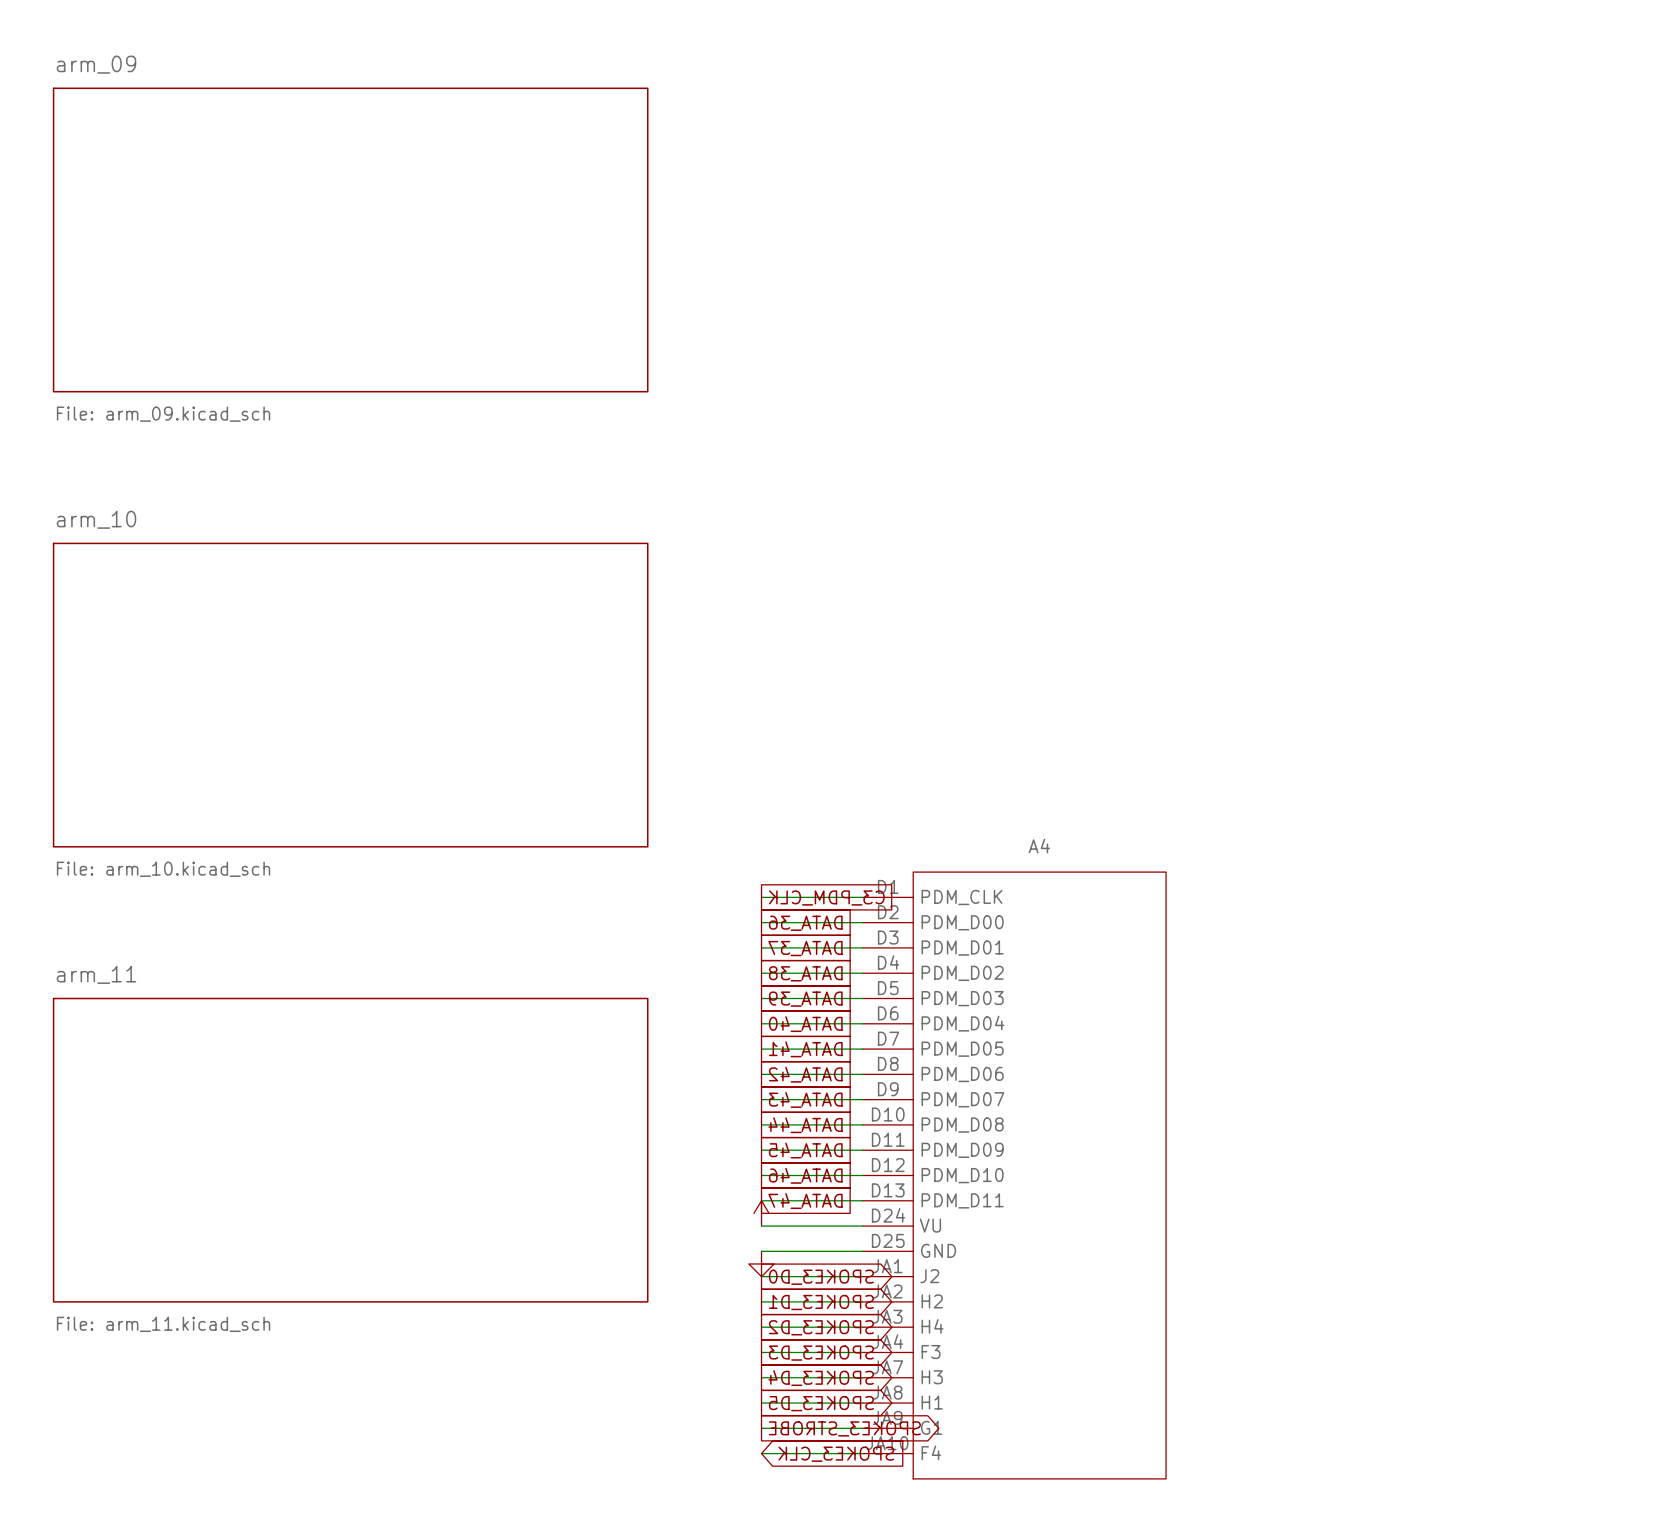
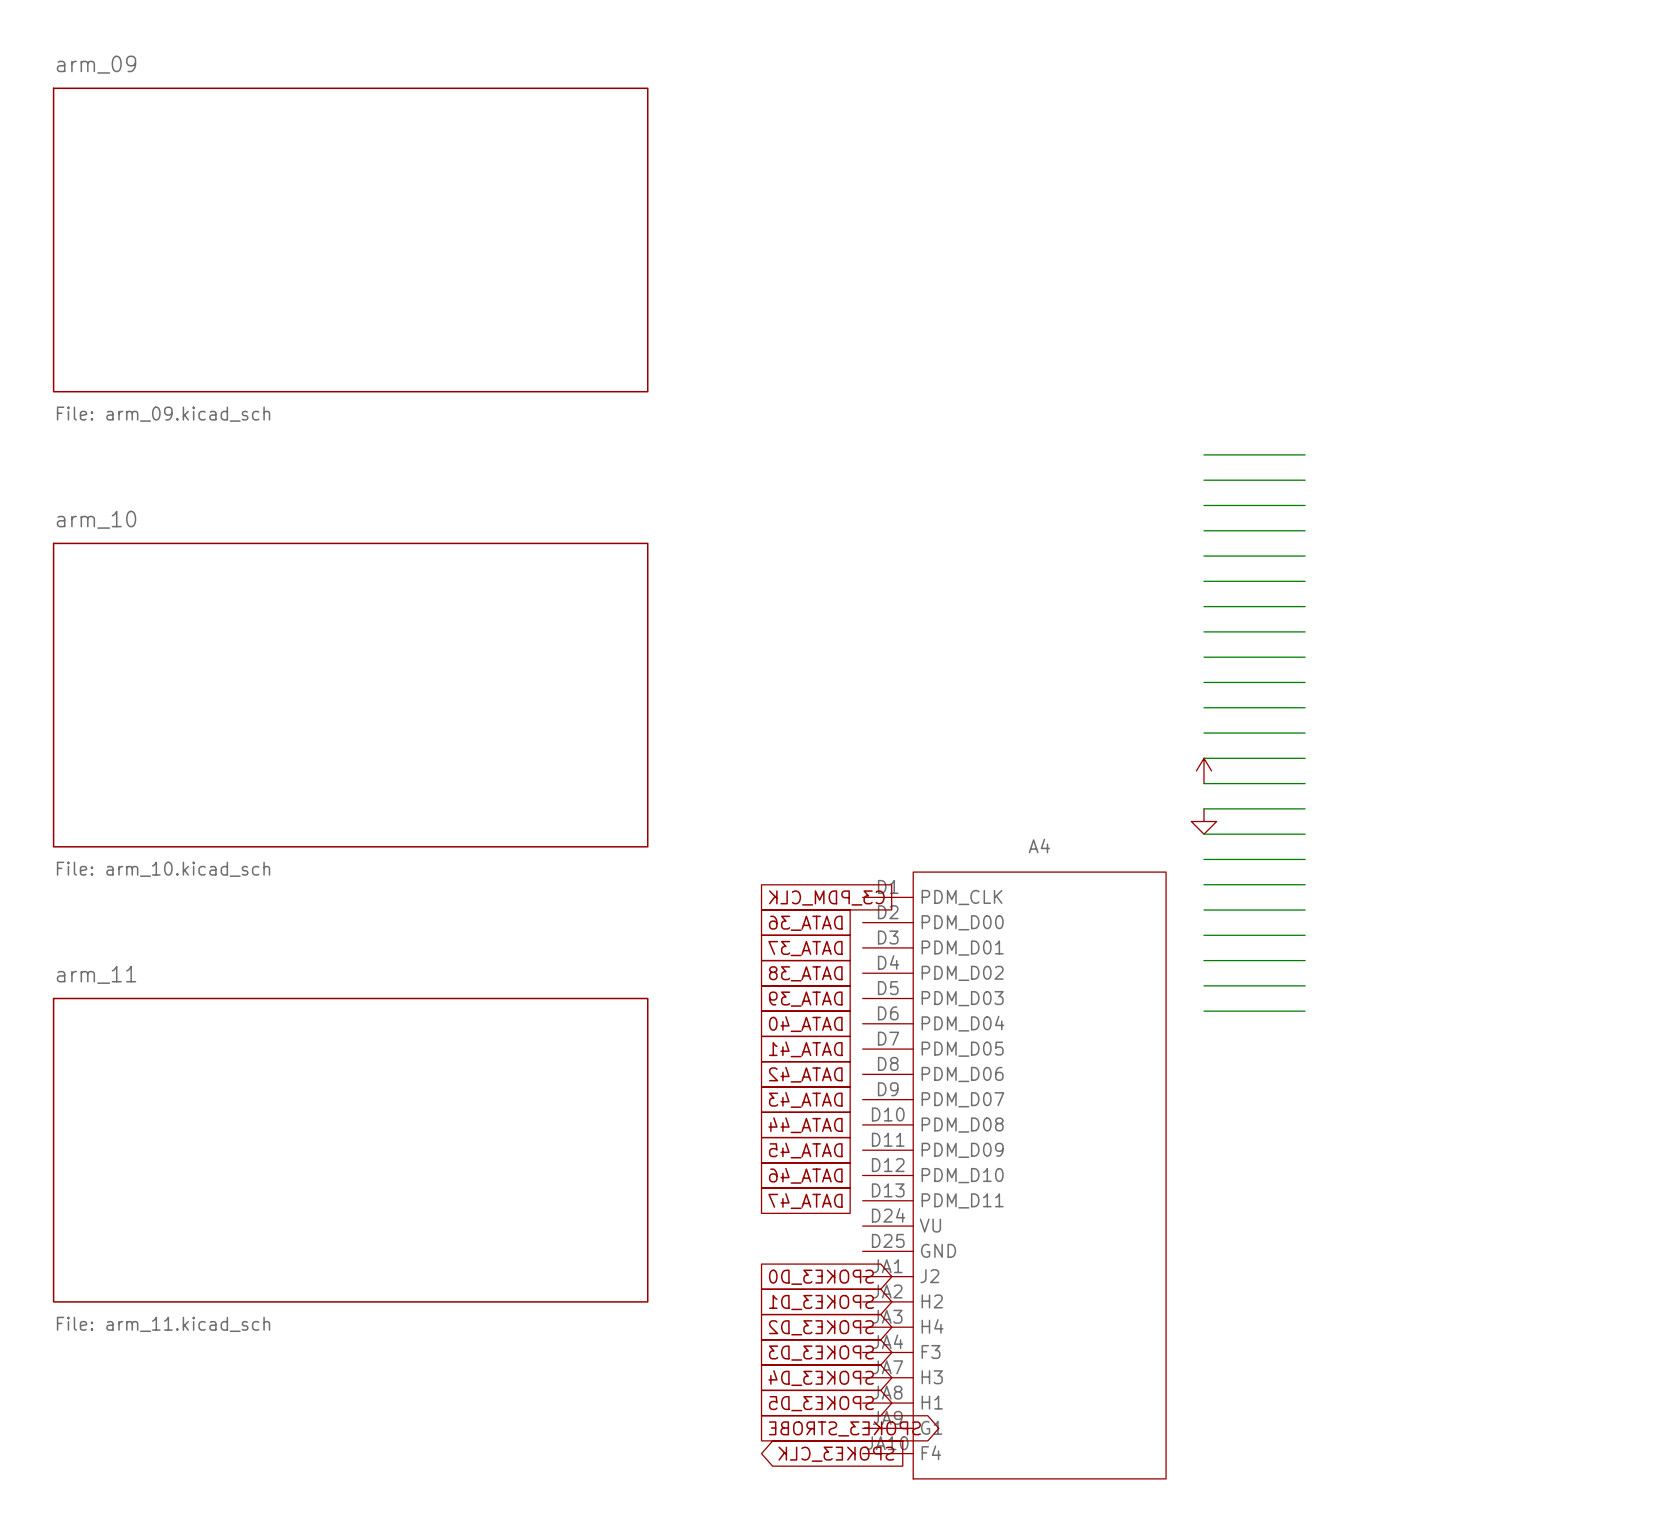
wire: none -> (1203, 454) (1305, 454)
wire: none -> (1203, 480) (1305, 480)
wire: none -> (1203, 505) (1305, 505)
wire: none -> (1203, 530) (1305, 530)
wire: none -> (1203, 556) (1305, 556)
wire: none -> (1203, 581) (1305, 581)
wire: none -> (1203, 606) (1305, 606)
wire: none -> (1203, 631) (1305, 631)
wire: none -> (1203, 657) (1305, 657)
wire: none -> (1203, 682) (1305, 682)
wire: none -> (1203, 707) (1305, 707)
wire: none -> (1203, 733) (1305, 733)
wire: none -> (1203, 758) (1305, 758)
power symbol: none -> (1203, 770)
wire: none -> (1203, 783) (1305, 783)
wire: none -> (1203, 808) (1305, 808)
power symbol: none -> (1203, 821)
wire: none -> (1203, 834) (1305, 834)
wire: none -> (1203, 859) (1305, 859)
wire: none -> (1203, 884) (1305, 884)
wire: (761, 897) (862, 897) -> none
wire: none -> (1203, 910) (1305, 910)
wire: (761, 922) (862, 922) -> none
wire: none -> (1203, 935) (1305, 935)
wire: (761, 947) (862, 947) -> none
wire: none -> (1203, 960) (1305, 960)
wire: (761, 973) (862, 973) -> none
wire: none -> (1203, 985) (1305, 985)
wire: (761, 998) (862, 998) -> none
wire: none -> (1203, 1011) (1305, 1011)
wire: (761, 1023) (862, 1023) -> none
wire: (761, 1049) (862, 1049) -> none
wire: (761, 1074) (862, 1074) -> none
wire: (761, 1099) (862, 1099) -> none
wire: (761, 1124) (862, 1124) -> none
wire: (761, 1150) (862, 1150) -> none
wire: (761, 1175) (862, 1175) -> none
wire: (761, 1200) (862, 1200) -> none
power symbol: (761, 1213) -> none
wire: (761, 1226) (862, 1226) -> none
wire: (761, 1251) (862, 1251) -> none
power symbol: (761, 1263) -> none
wire: (761, 1276) (862, 1276) -> none
wire: (761, 1301) (862, 1301) -> none
wire: (761, 1327) (862, 1327) -> none
wire: (761, 1352) (862, 1352) -> none
wire: (761, 1377) (862, 1377) -> none
wire: (761, 1403) (862, 1403) -> none
wire: (761, 1428) (862, 1428) -> none
wire: (761, 1453) (862, 1453) -> none

